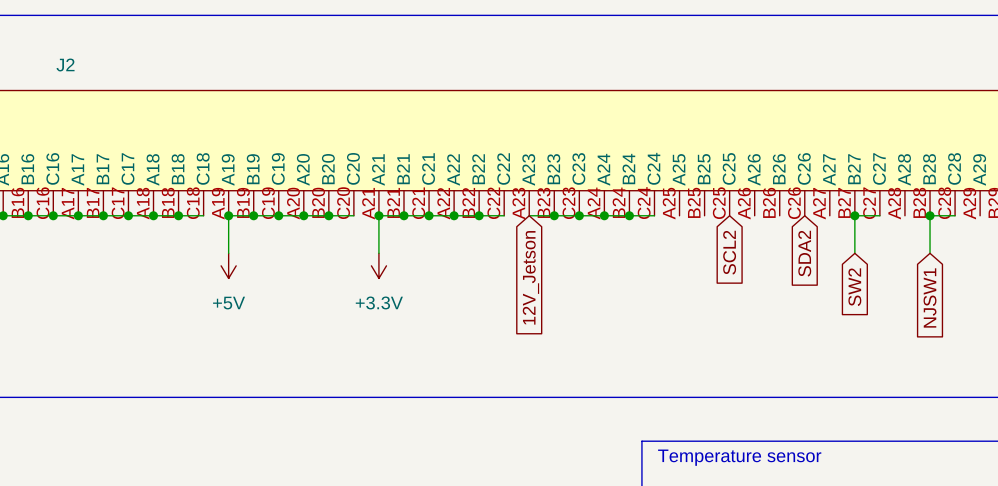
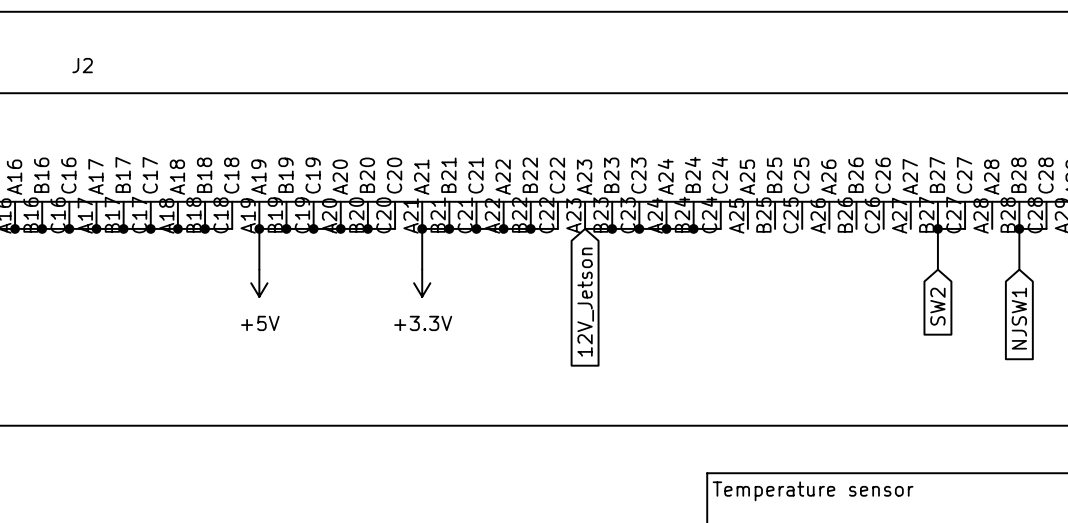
global label: SCL2 (729, 252) -> none
global label: SDA2 (804, 253) -> none

